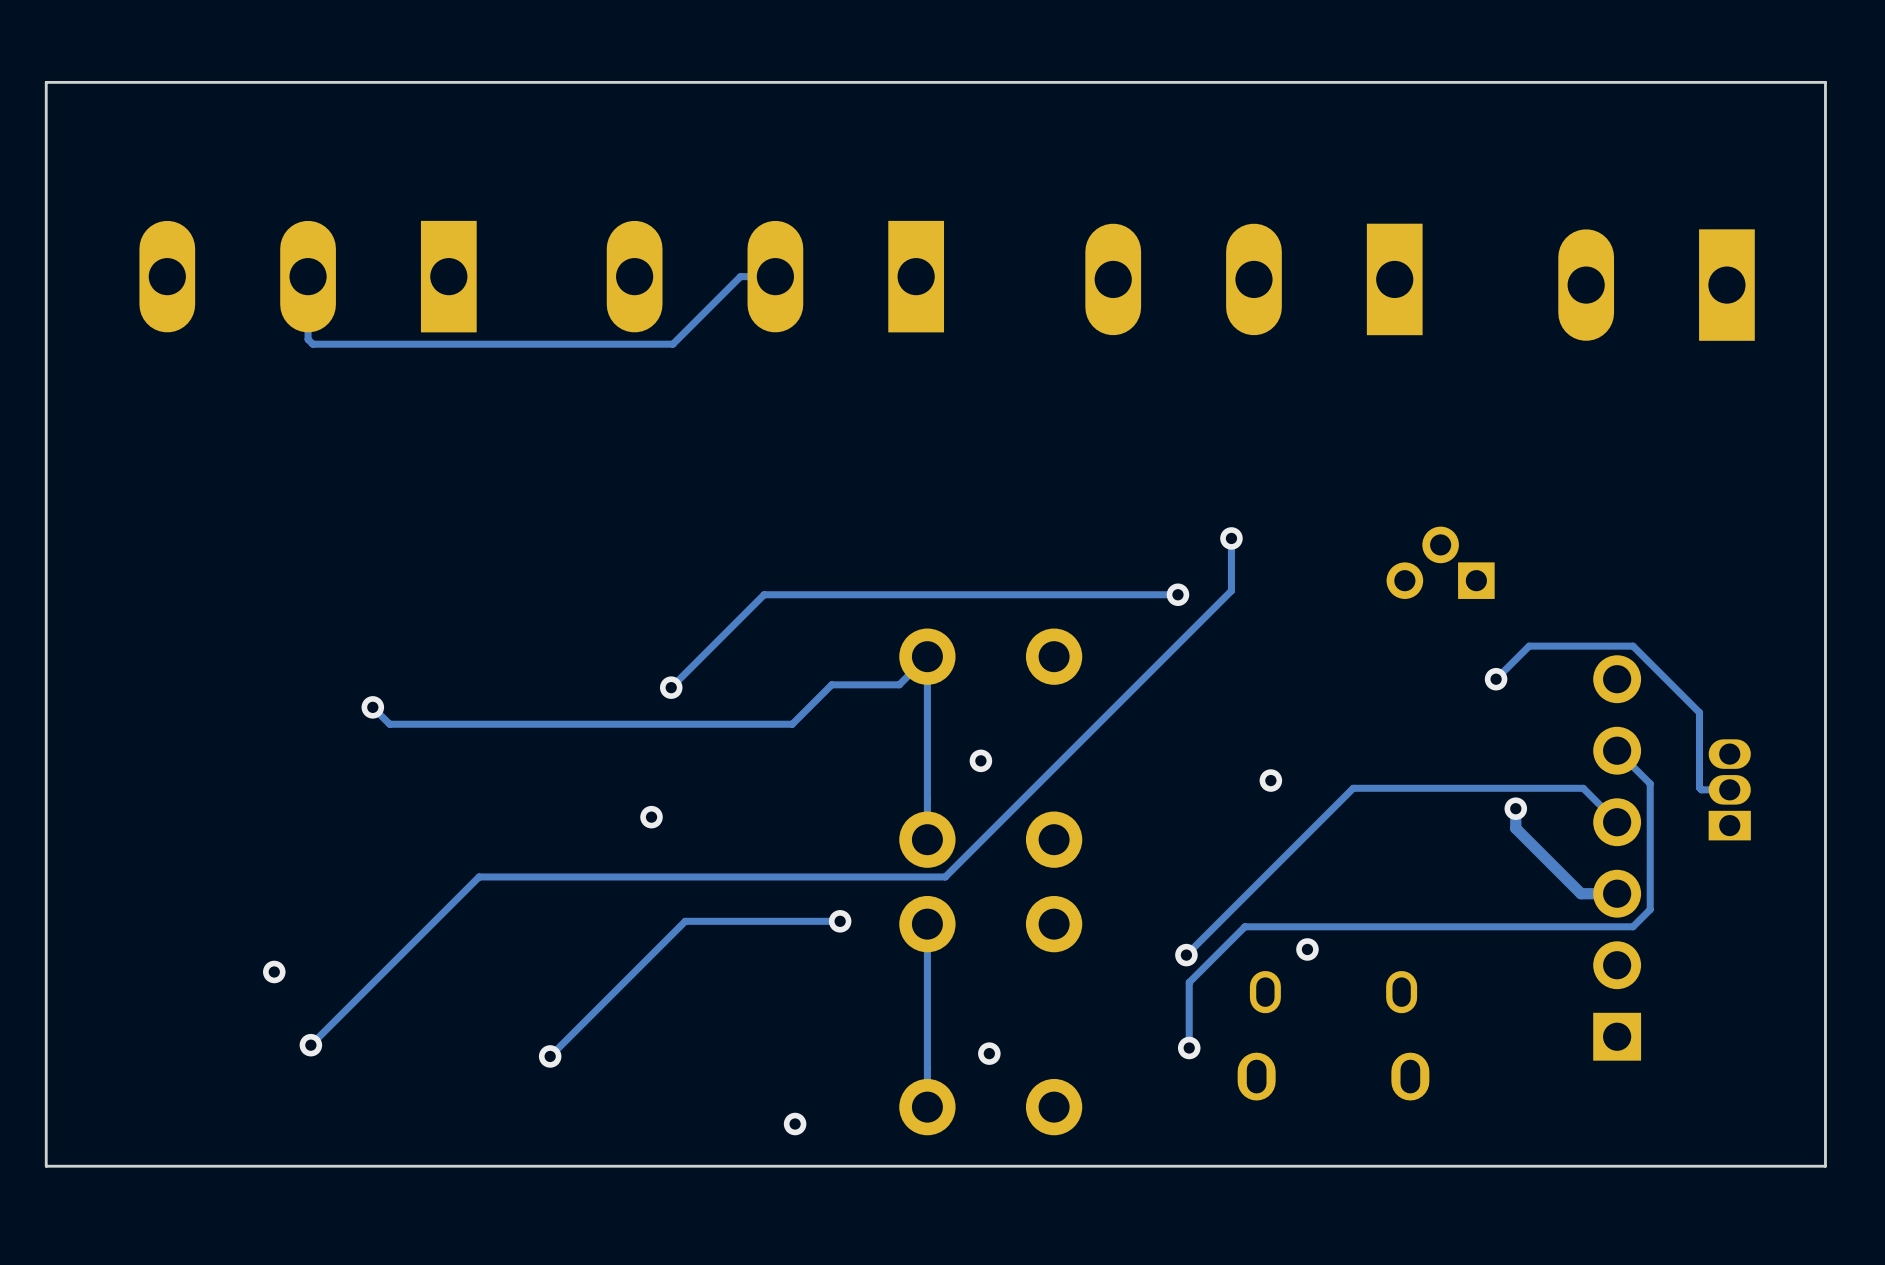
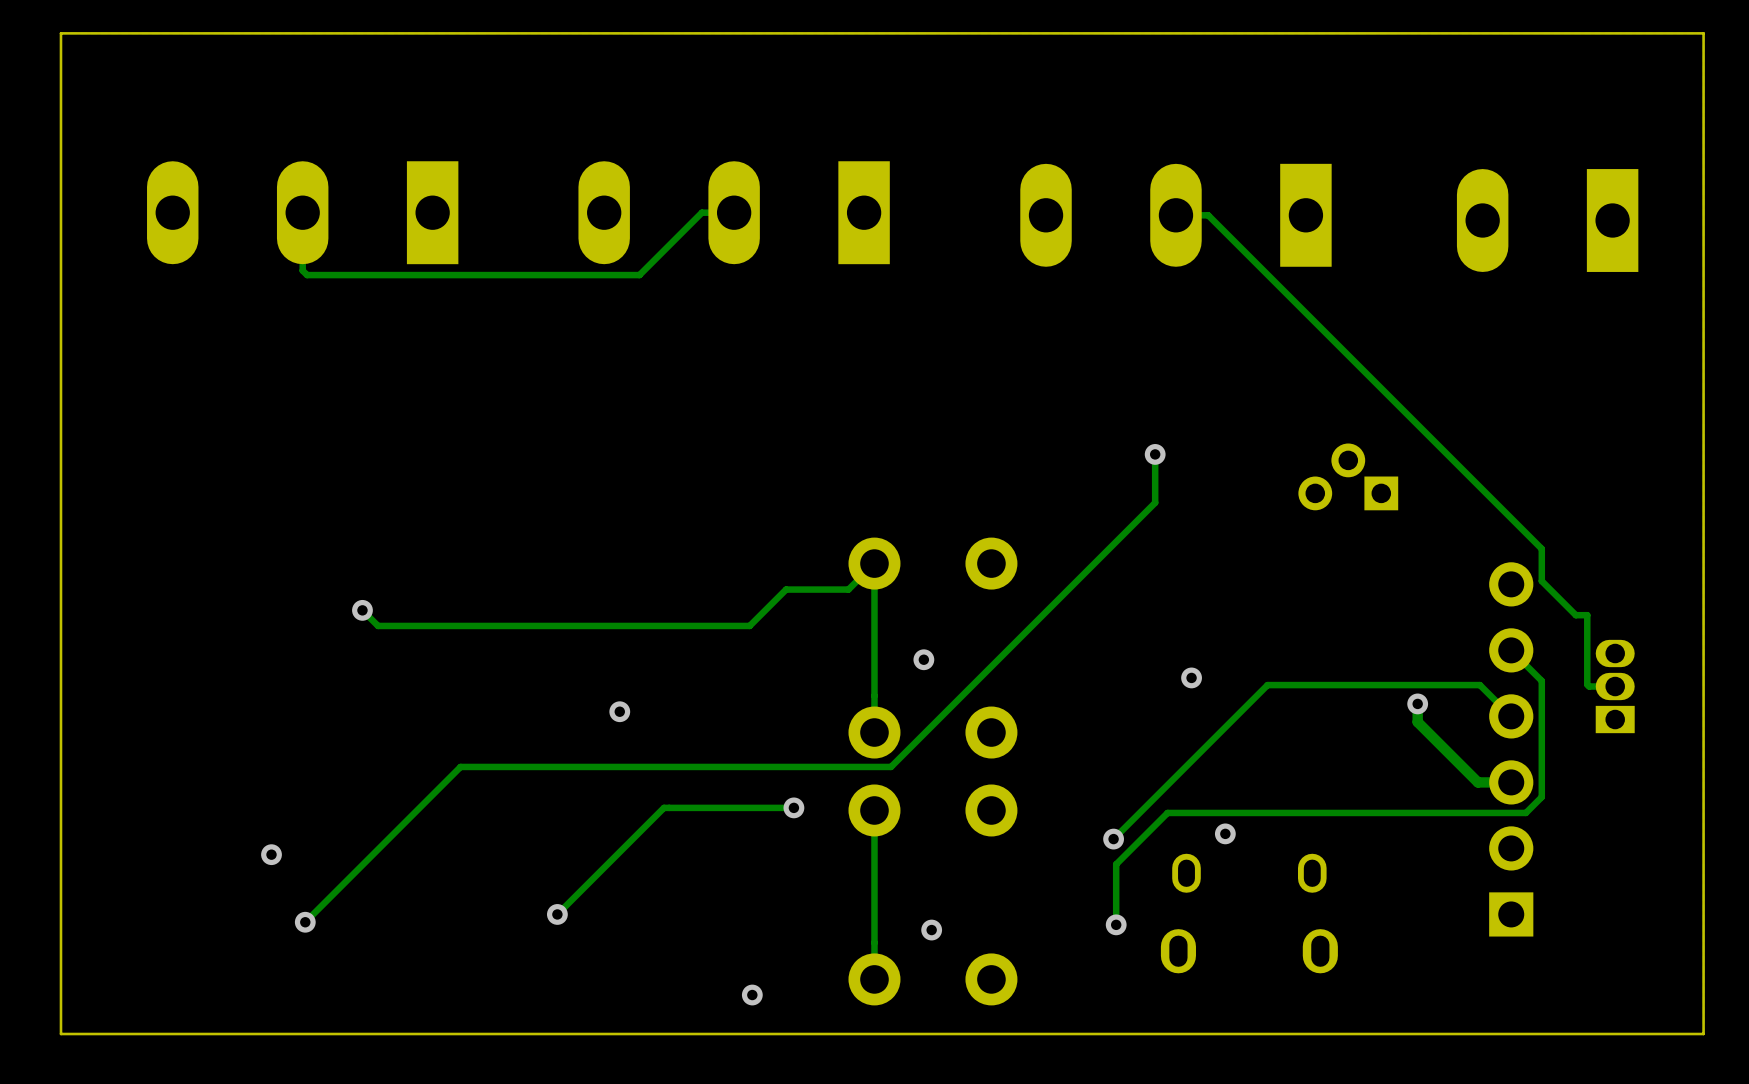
track: (1177, 594) (764, 594) (671, 687) -> none
via: (1177, 594) -> none
track: (1496, 679) (1529, 646) (1633, 646) (1699, 712) -> (1175, 215) (1208, 215) (1541, 548) (1541, 581) (1575, 615) (1587, 615)
via: (1496, 679) -> none
via: (671, 687) -> none
track: (699, 921) (685, 921) (550, 1056) -> (663, 807) (557, 914)
via position: (550, 1056) -> (557, 914)

